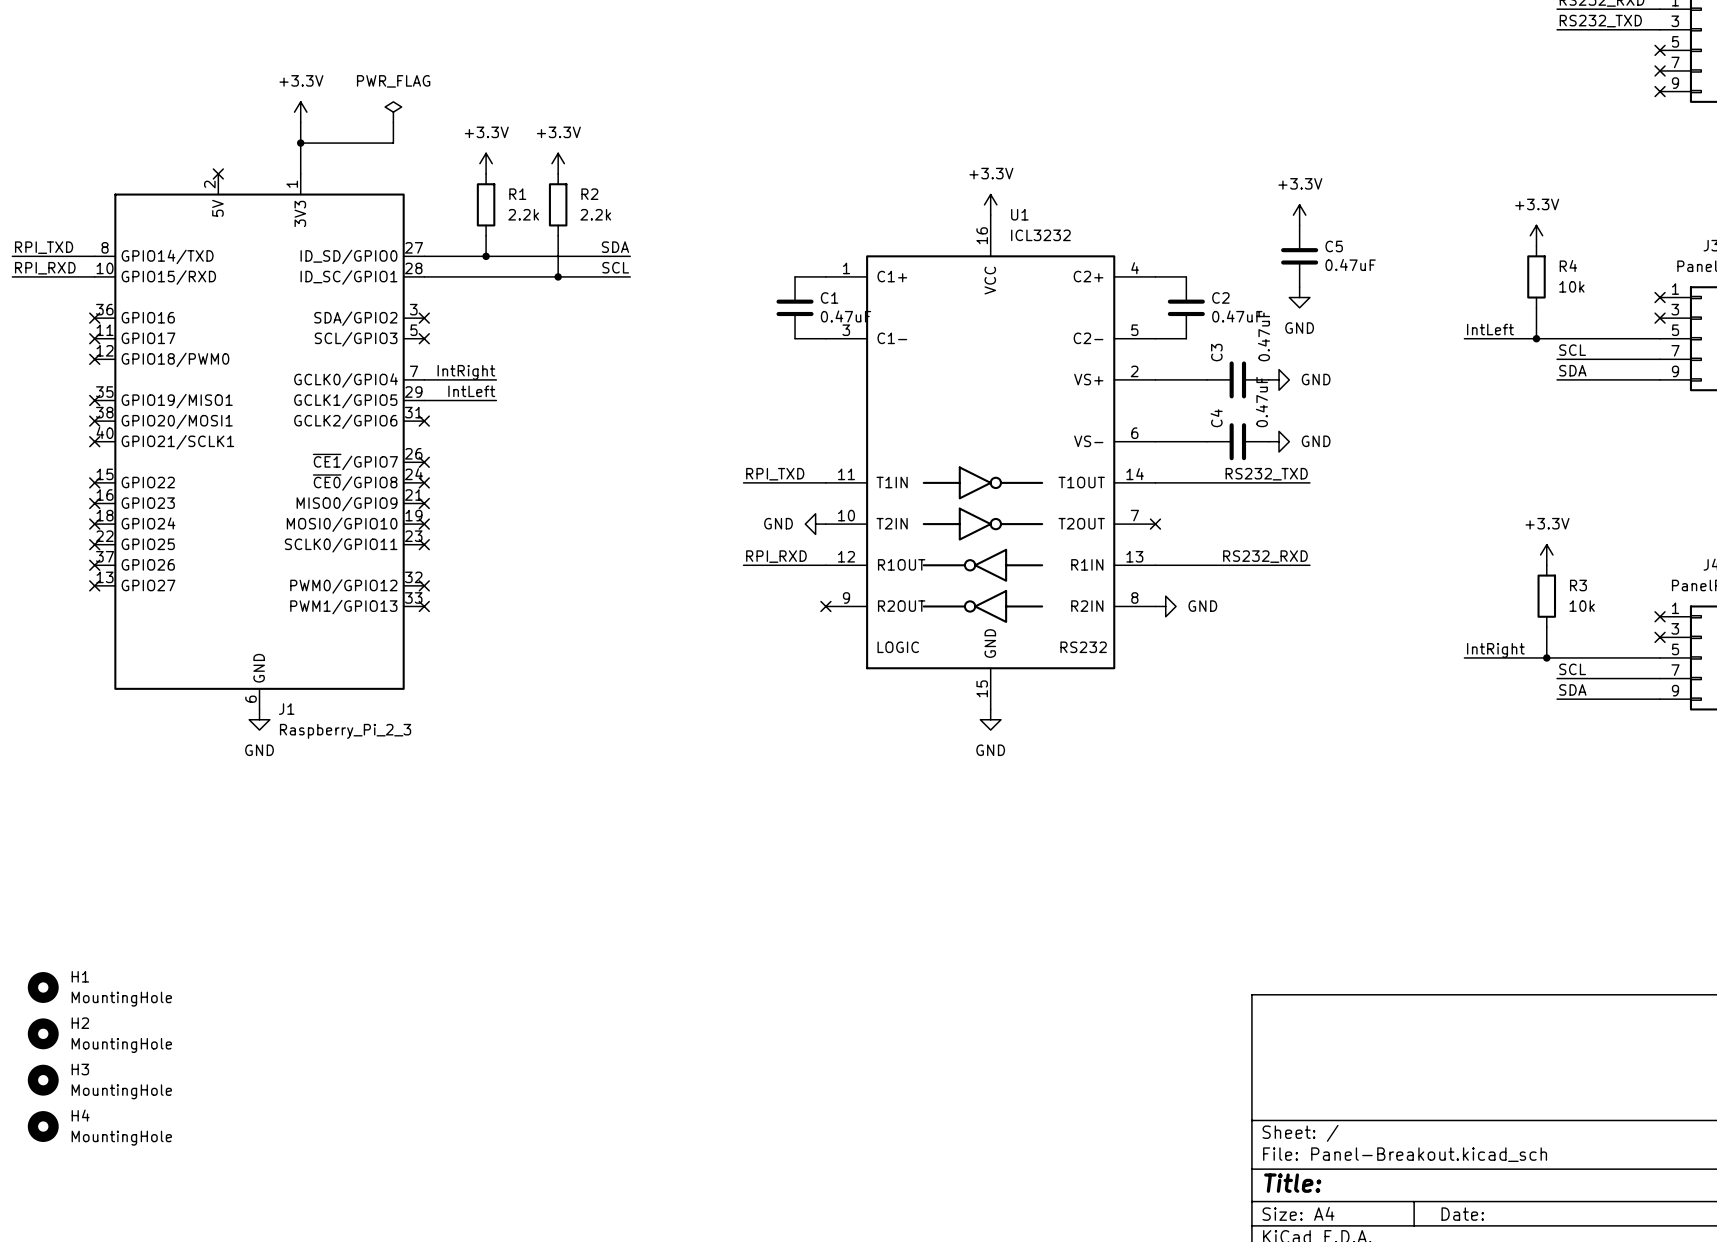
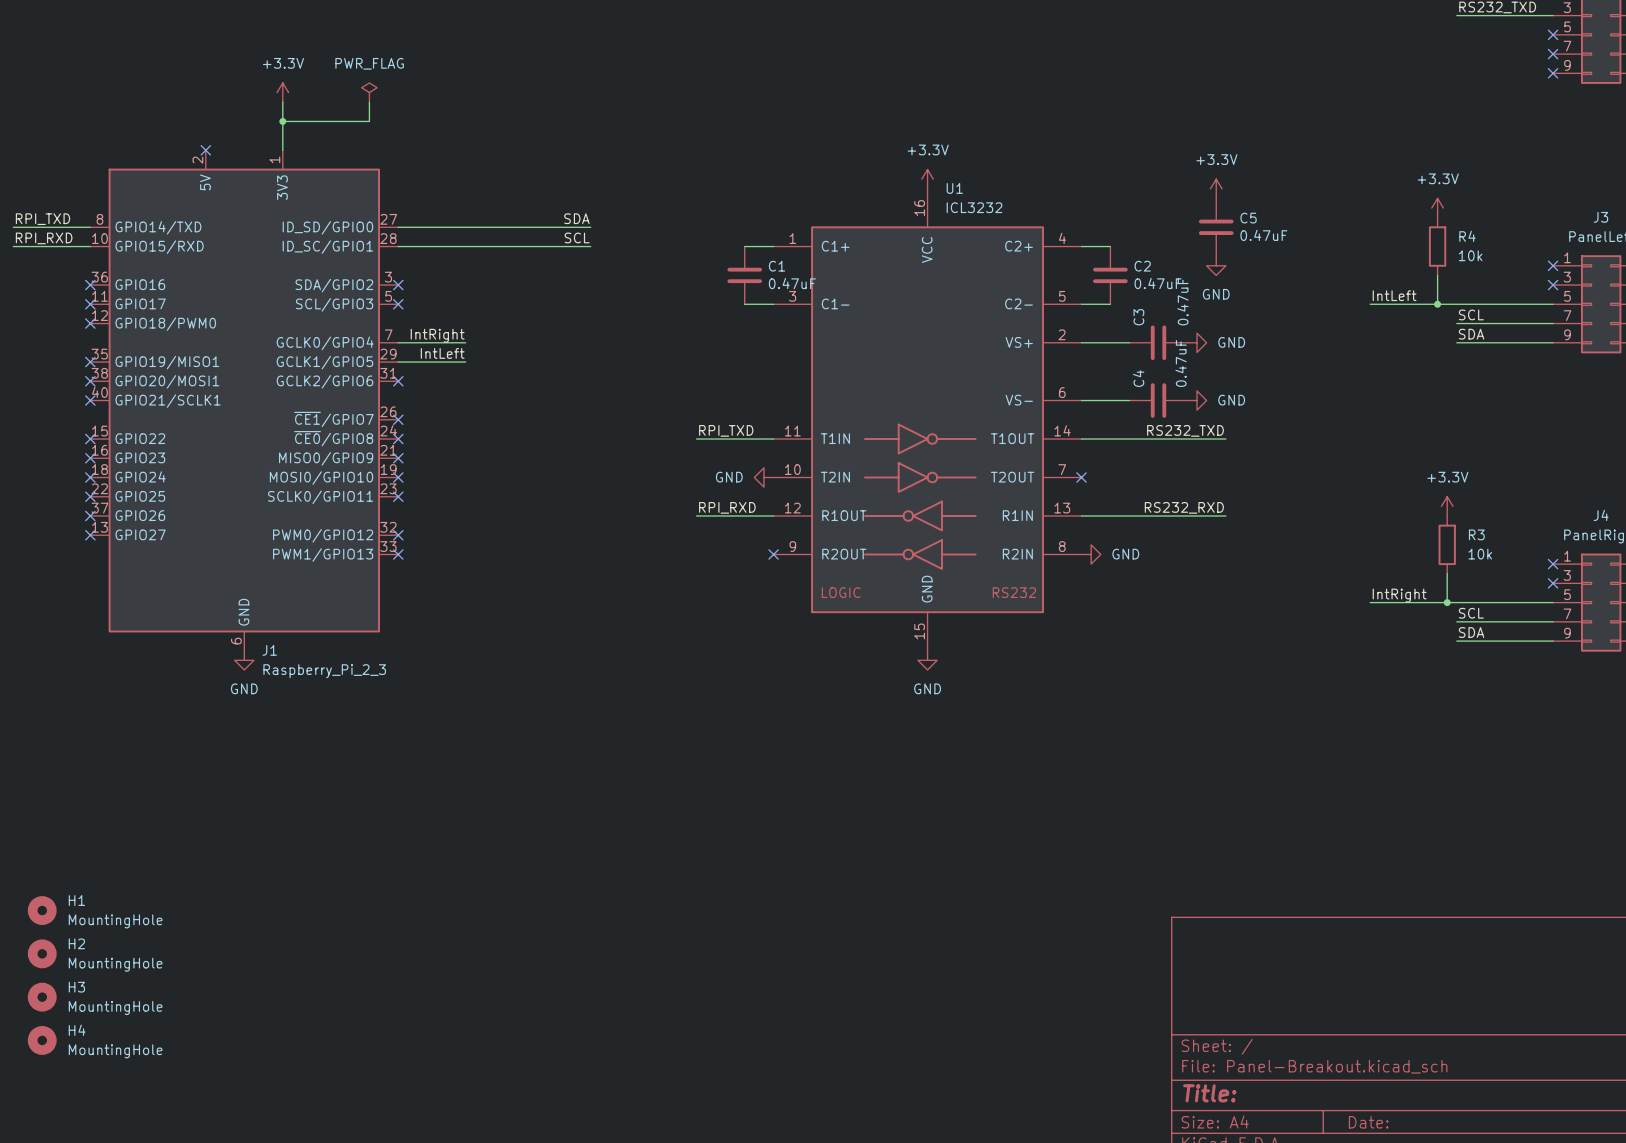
power symbol: +3.3V (486, 163) -> none
power symbol: +3.3V (558, 163) -> none
R1: 2.2k (486, 204) -> none
R2: 2.2k (558, 204) -> none
wire: (486, 235) (486, 256) -> none
wire: (558, 235) (558, 276) -> none
junction: (486, 256) -> none
junction: (558, 276) -> none

